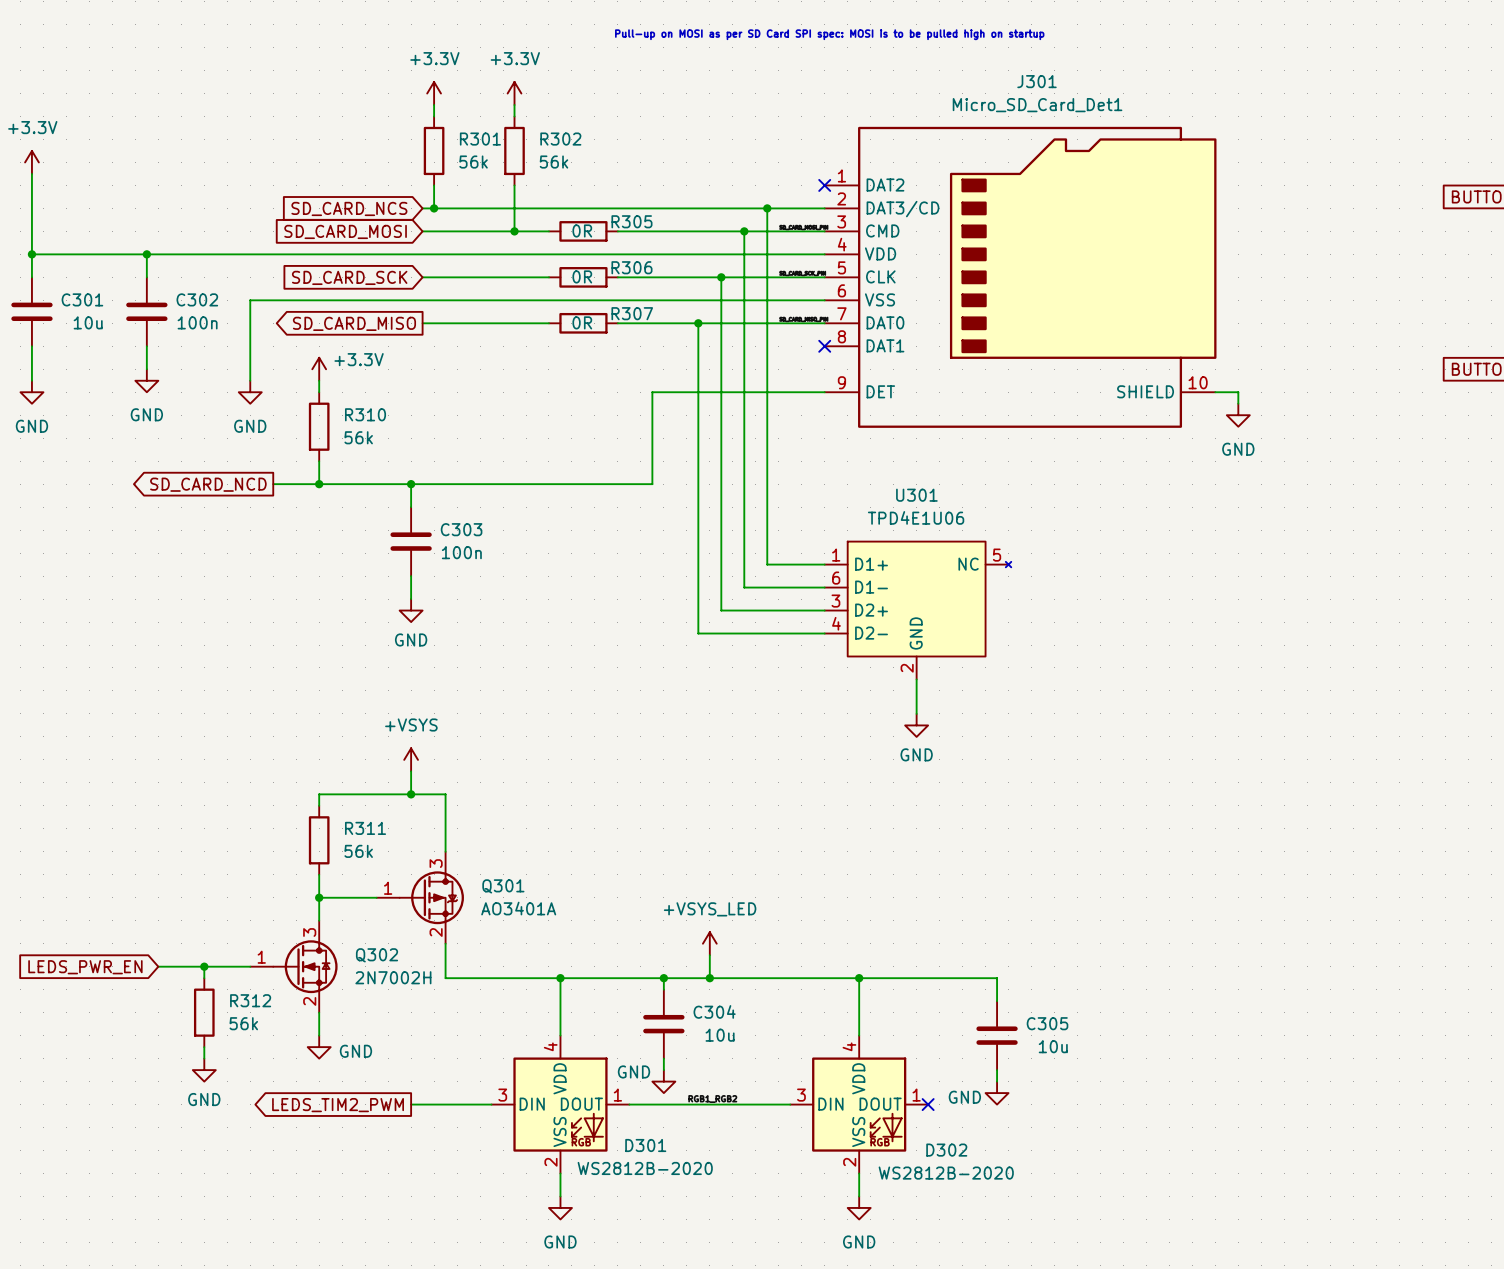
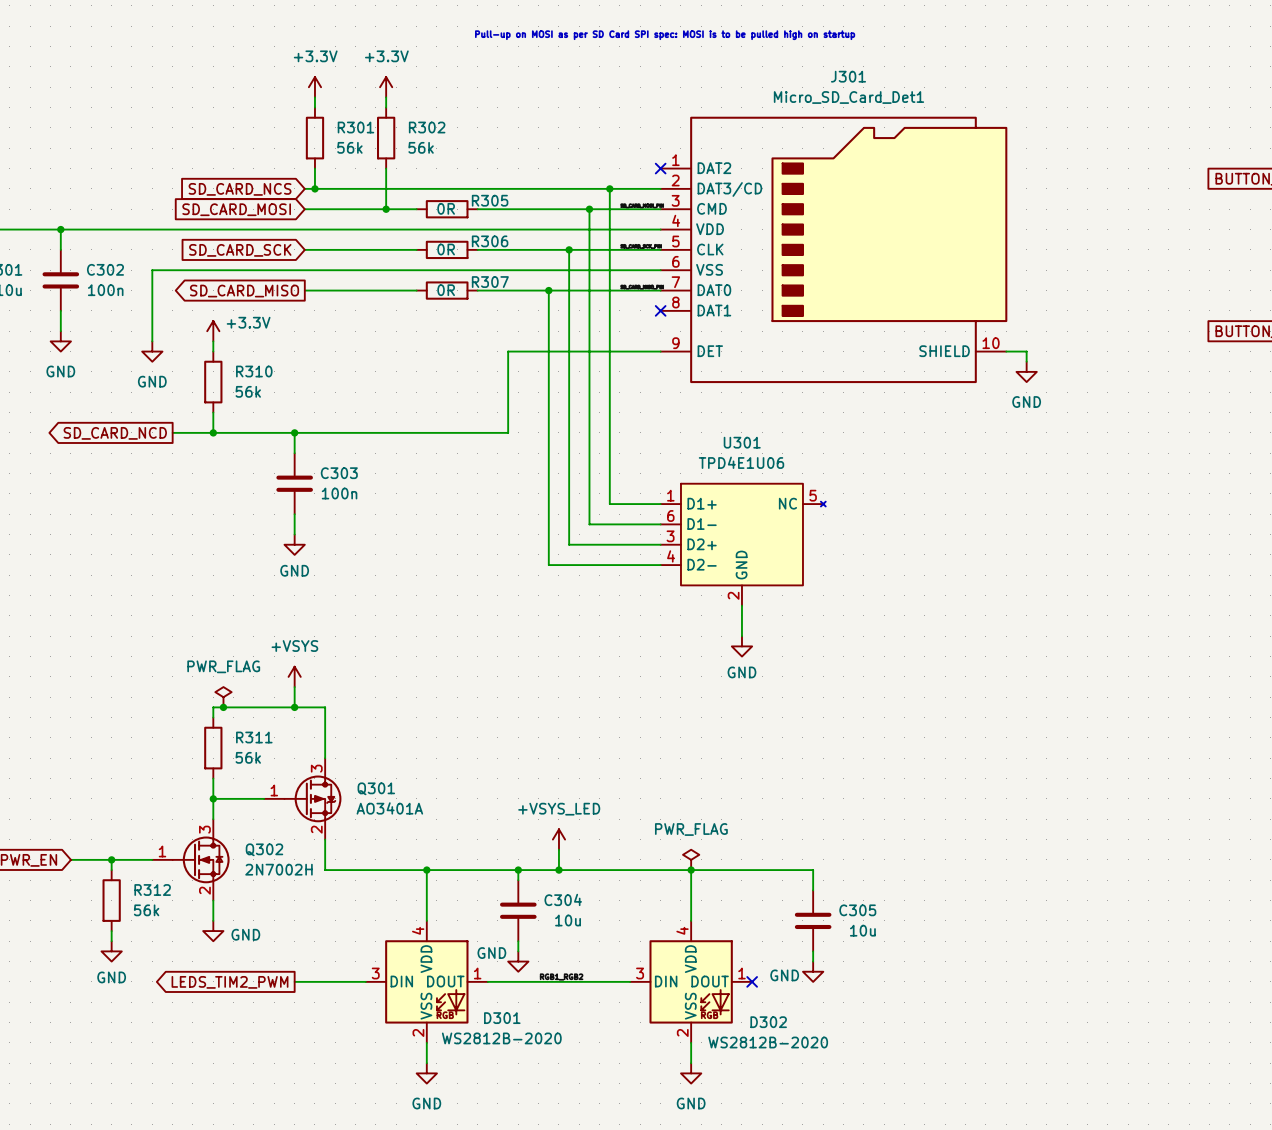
power symbol: none -> PWR_FLAG (223, 697)
junction: none -> (223, 707)
power symbol: none -> PWR_FLAG (691, 859)

